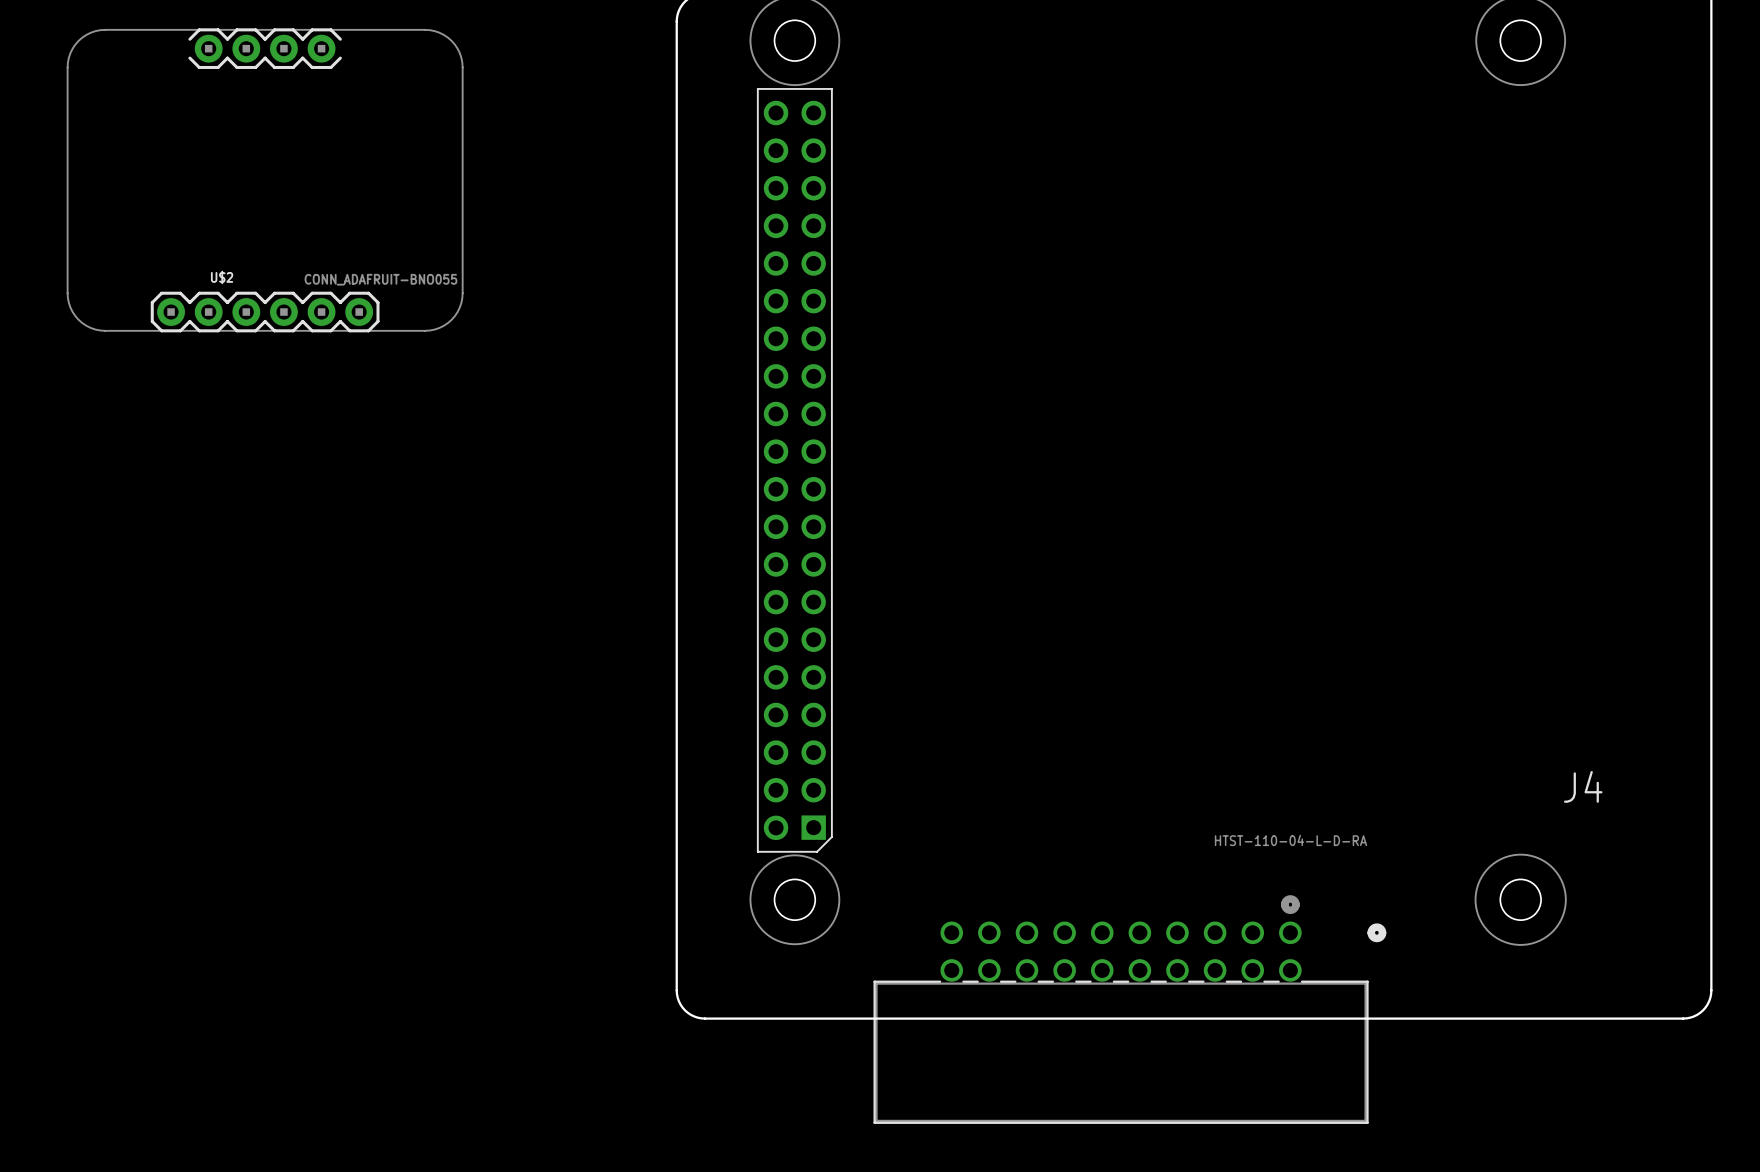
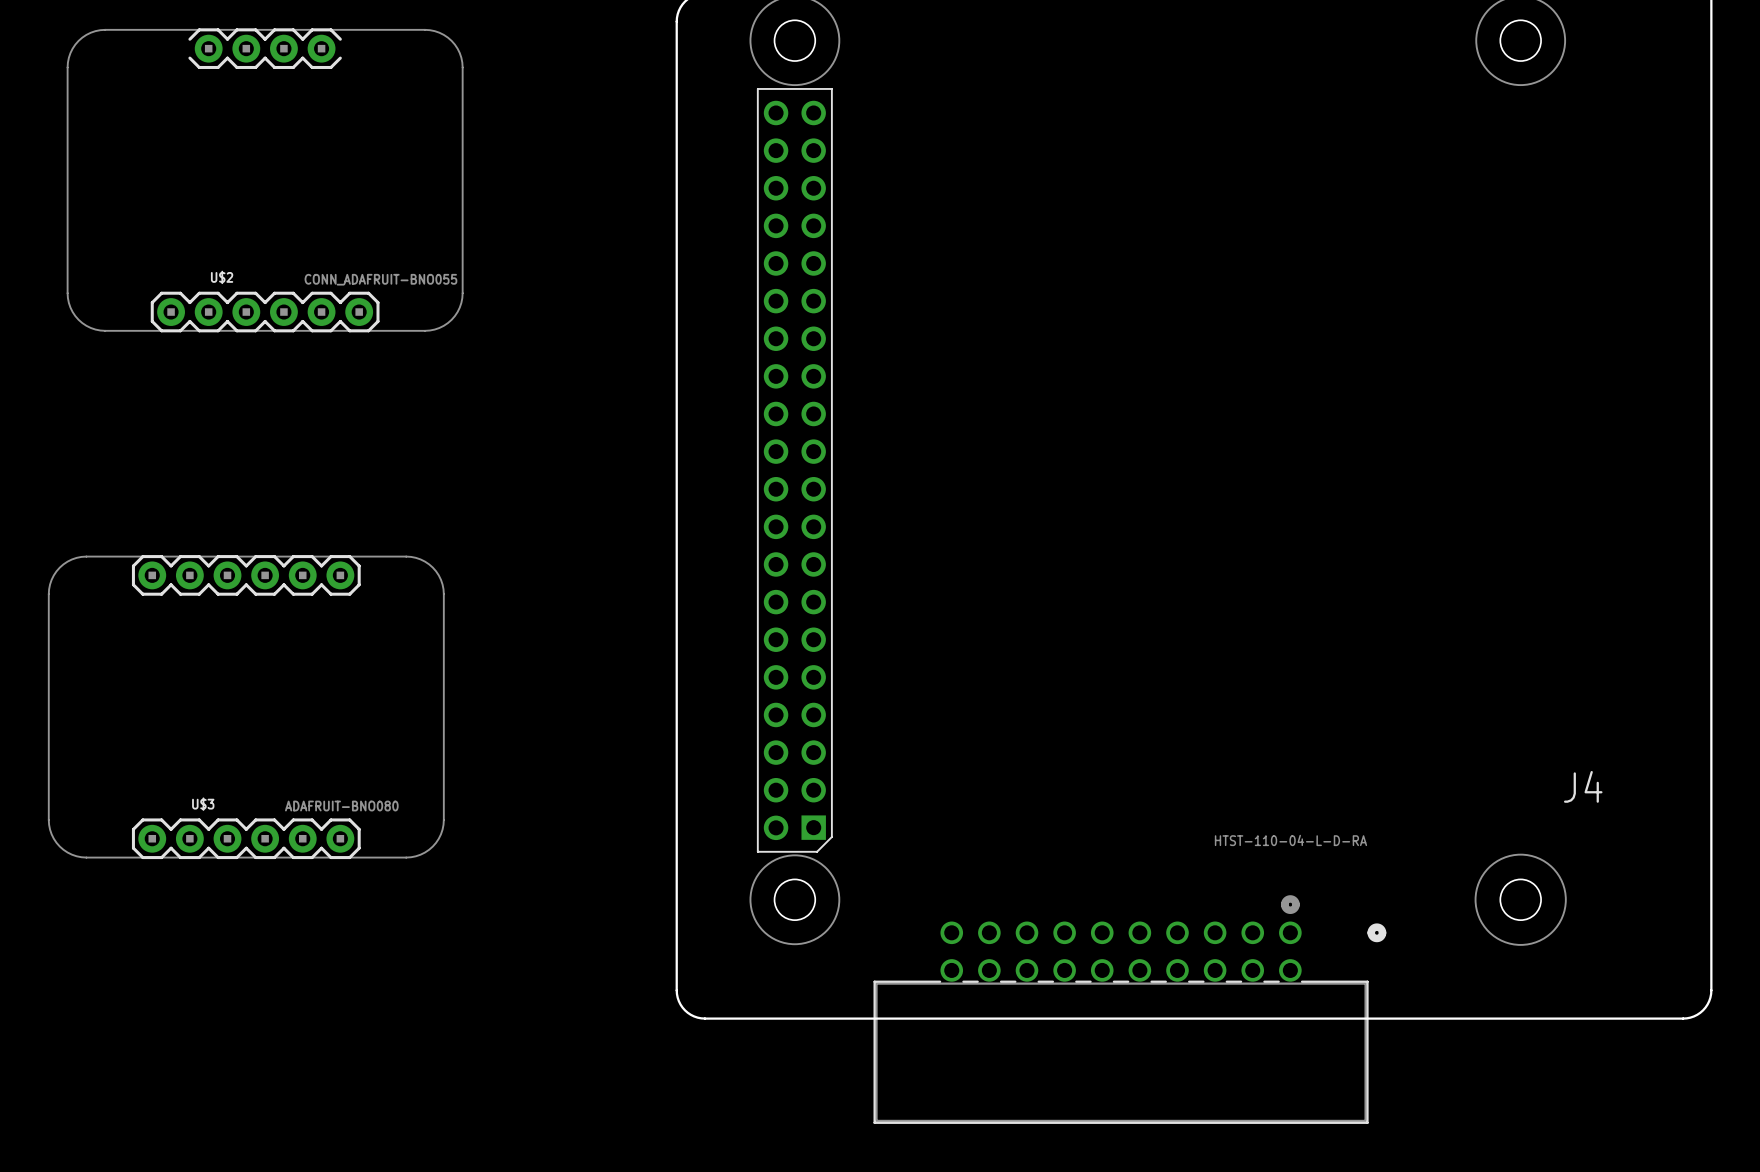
U$3: none -> ADAFRUIT-BNO080 (246, 707)

